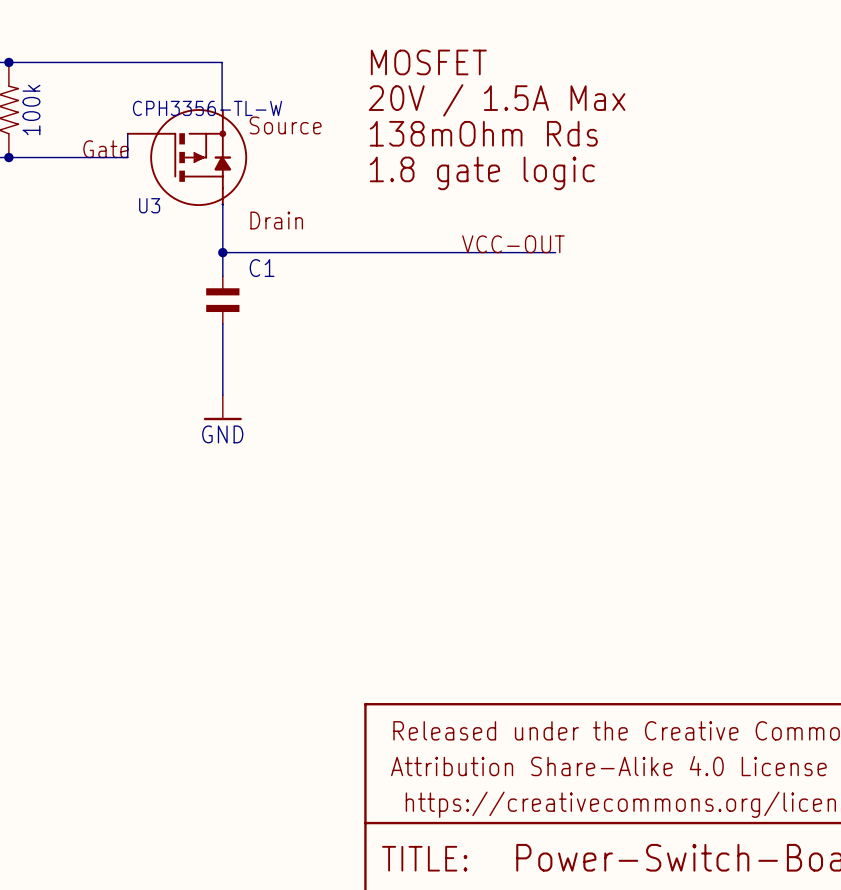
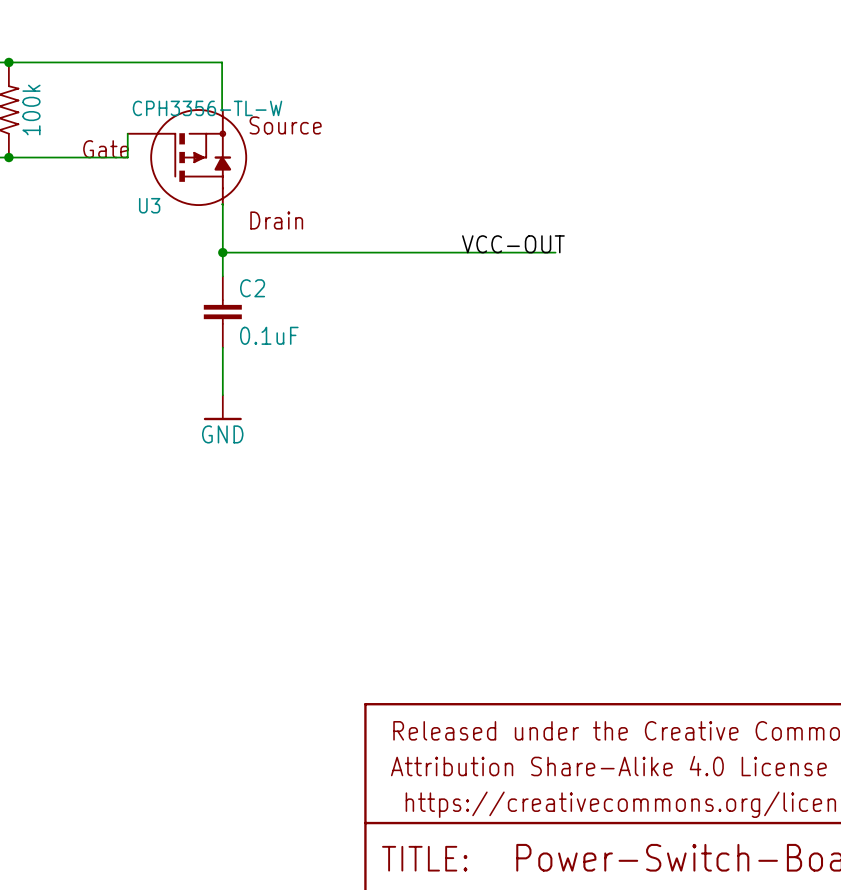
text: MOSFET (428, 62) -> none
text: 20V / 1.5A Max (497, 100) -> none
text: 138mOhm Rds (483, 133) -> none
text: 1.8 gate logic (482, 173) -> none
C1: (222, 300) -> none
C2: none -> 0.1uF (222, 312)

